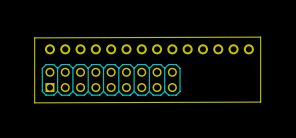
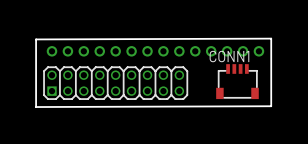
CONN1: none -> (237, 81)

